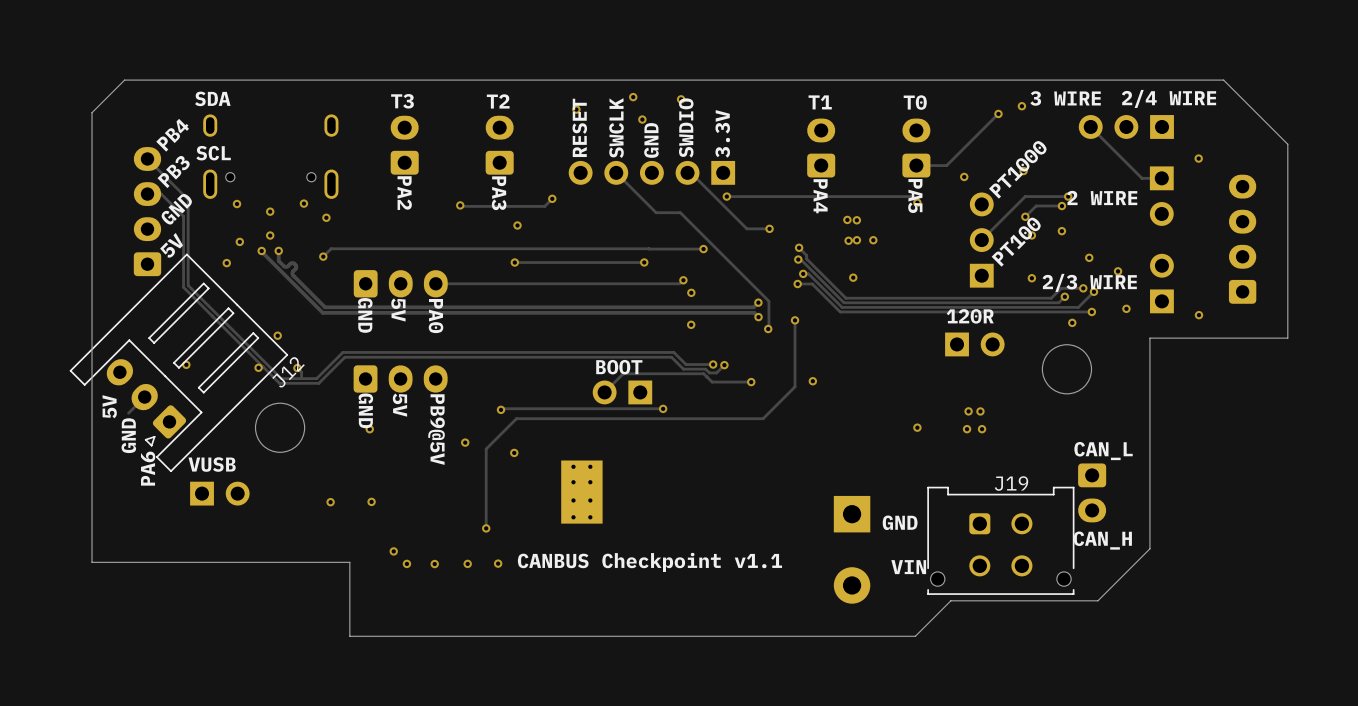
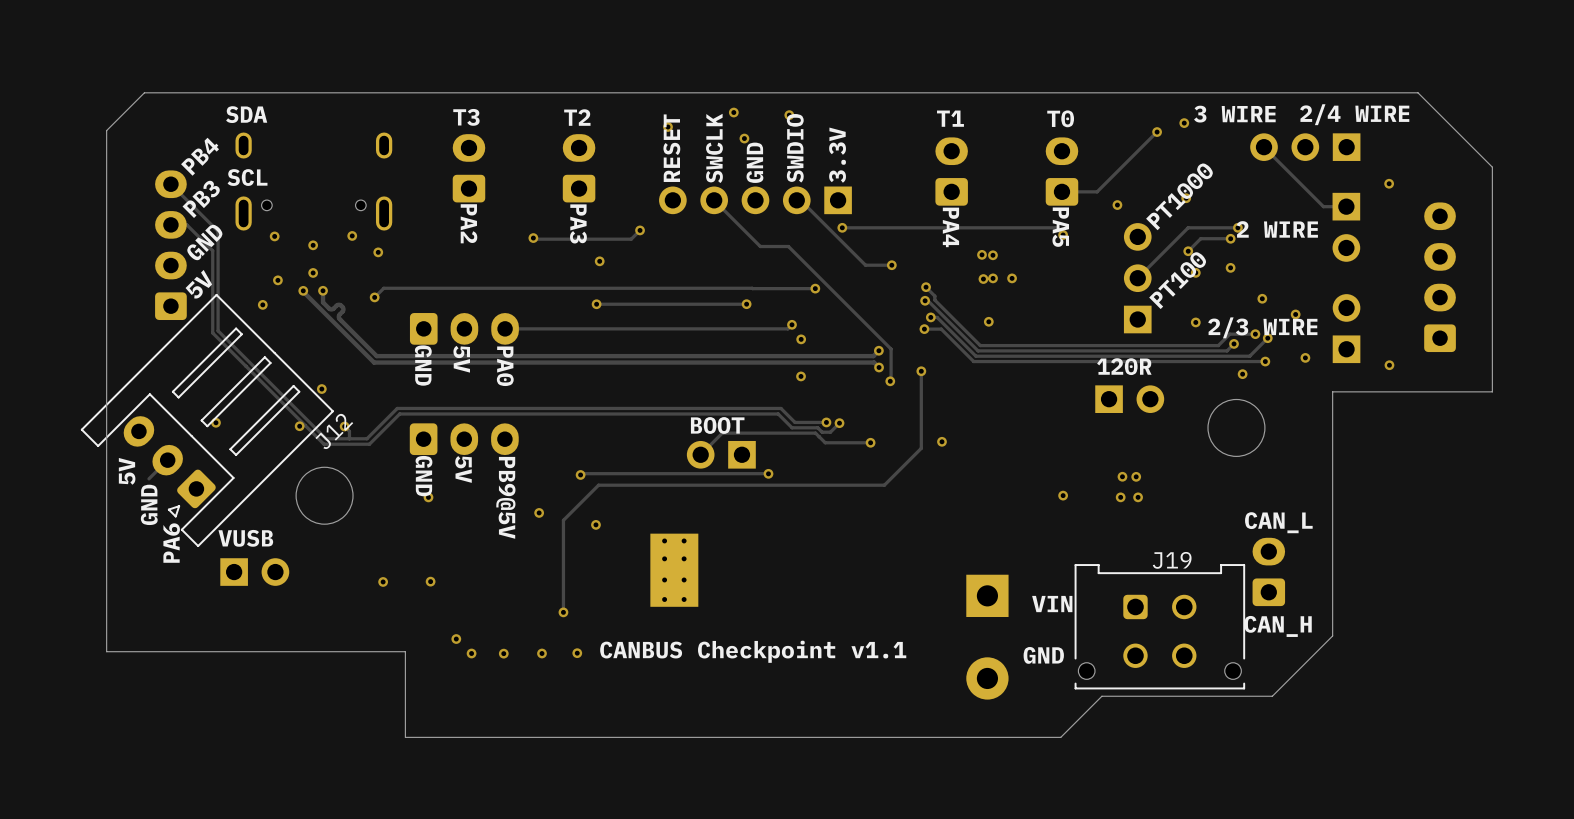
part rotation: 0° (1092, 492) -> 180° (1268, 571)
text: GND (900, 522) -> VIN (1052, 604)
text: VIN (908, 567) -> GND (1043, 655)

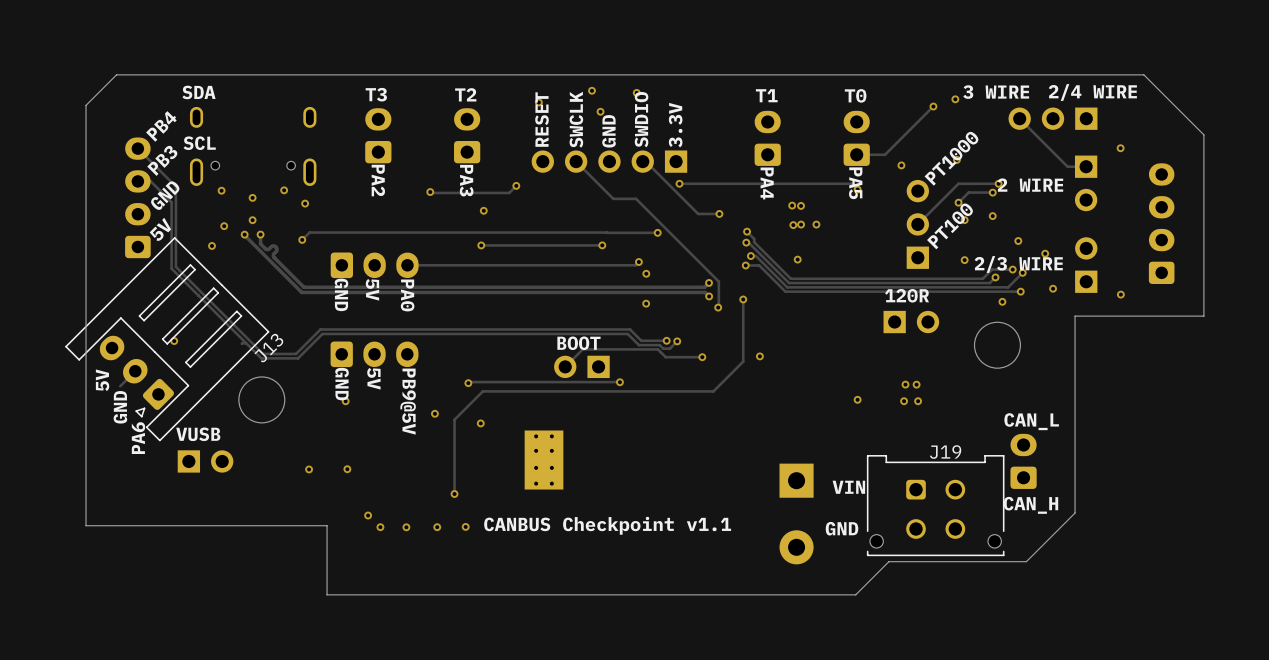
via: (321, 389) -> none
via: (299, 426) -> none
track: (344, 426) (349, 431) (349, 438) -> none
via: (344, 426) -> none
J12 name: J12 (334, 431) -> J13 (268, 348)

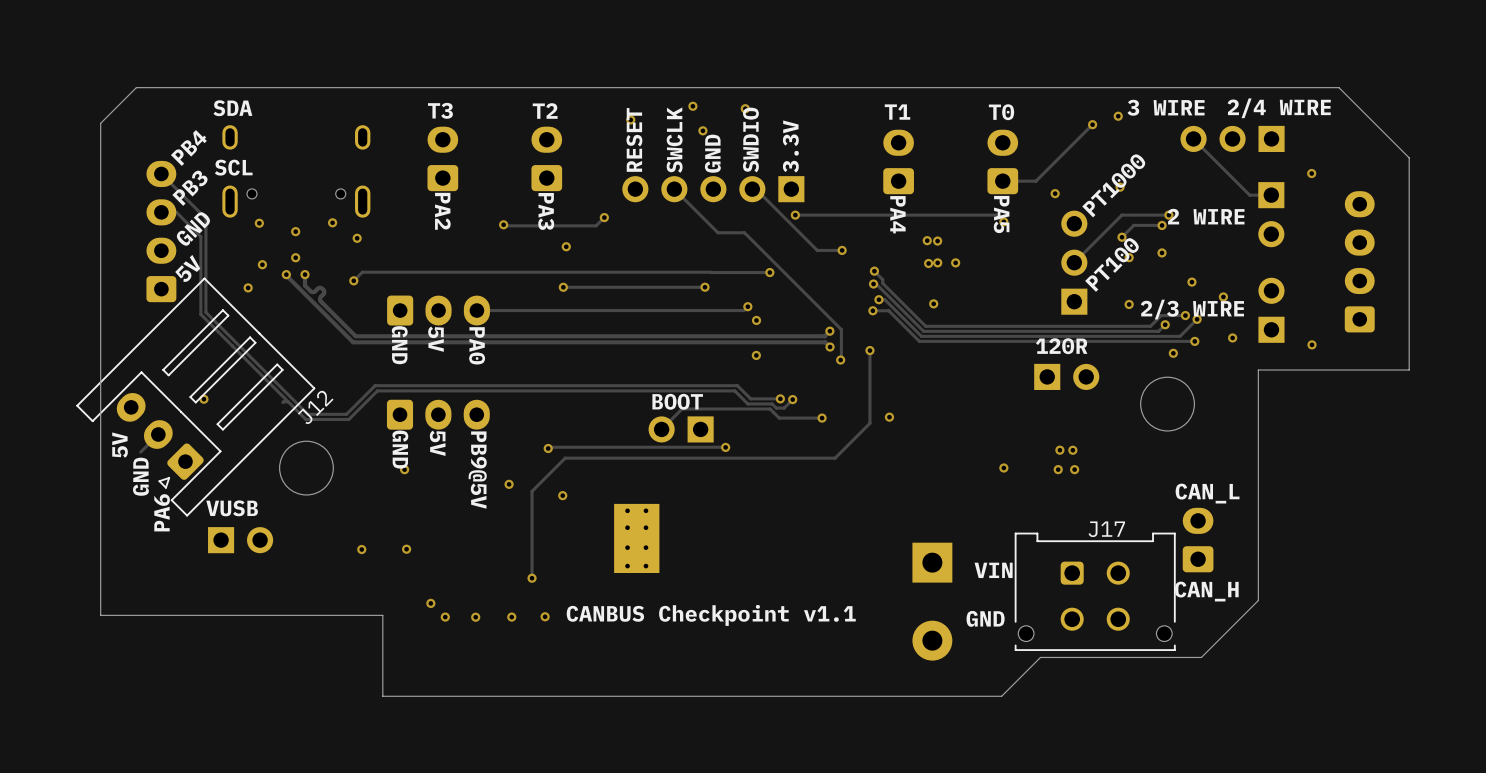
J13 name: J13 (268, 348) -> J12 (315, 407)
J19 name: J19 (945, 452) -> J17 (1106, 529)

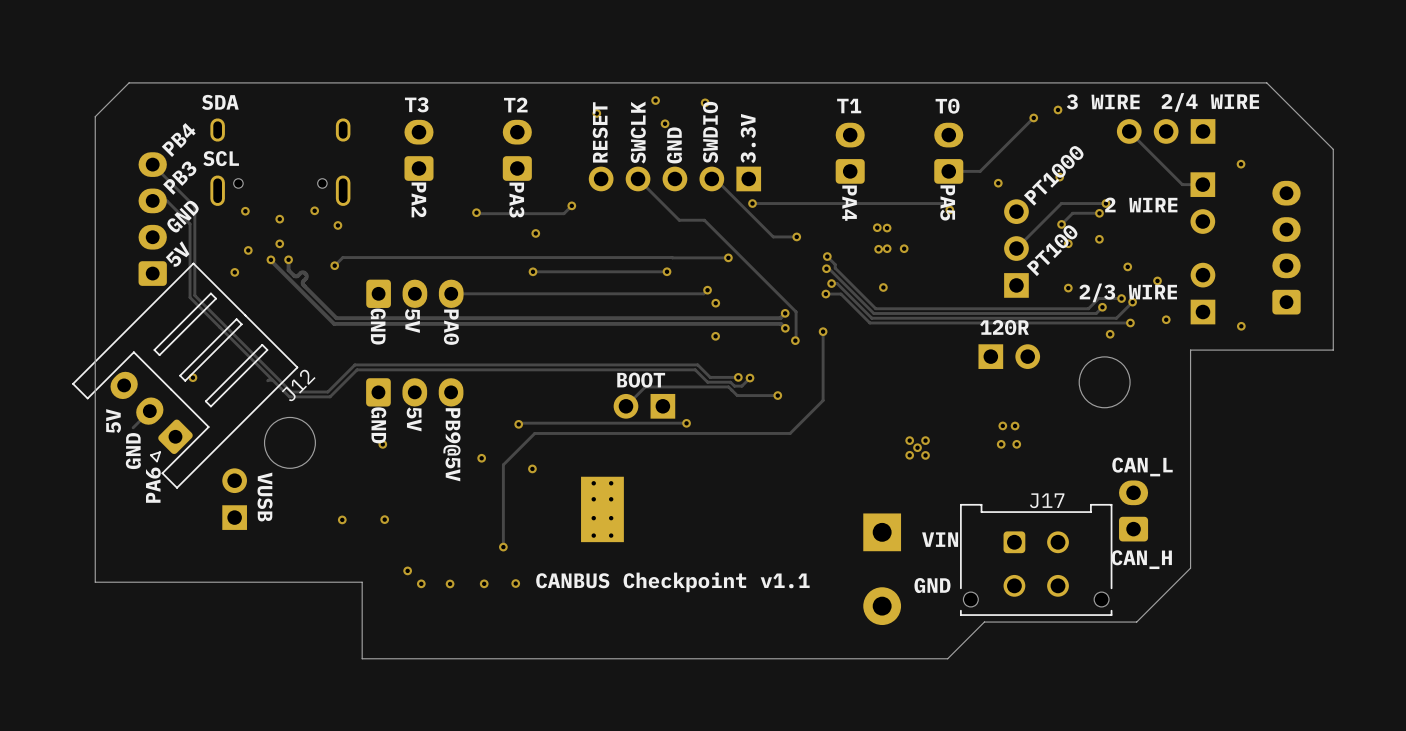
via: (889, 417) -> none
via: none -> (909, 440)
via: none -> (925, 440)
via: (1003, 467) -> none
via: none -> (917, 447)
via: none -> (909, 455)
via: none -> (925, 455)
text rotation: 0° (232, 508) -> 90° clockwise (265, 497)
part rotation: 0° (240, 540) -> 90° counterclockwise (234, 499)

